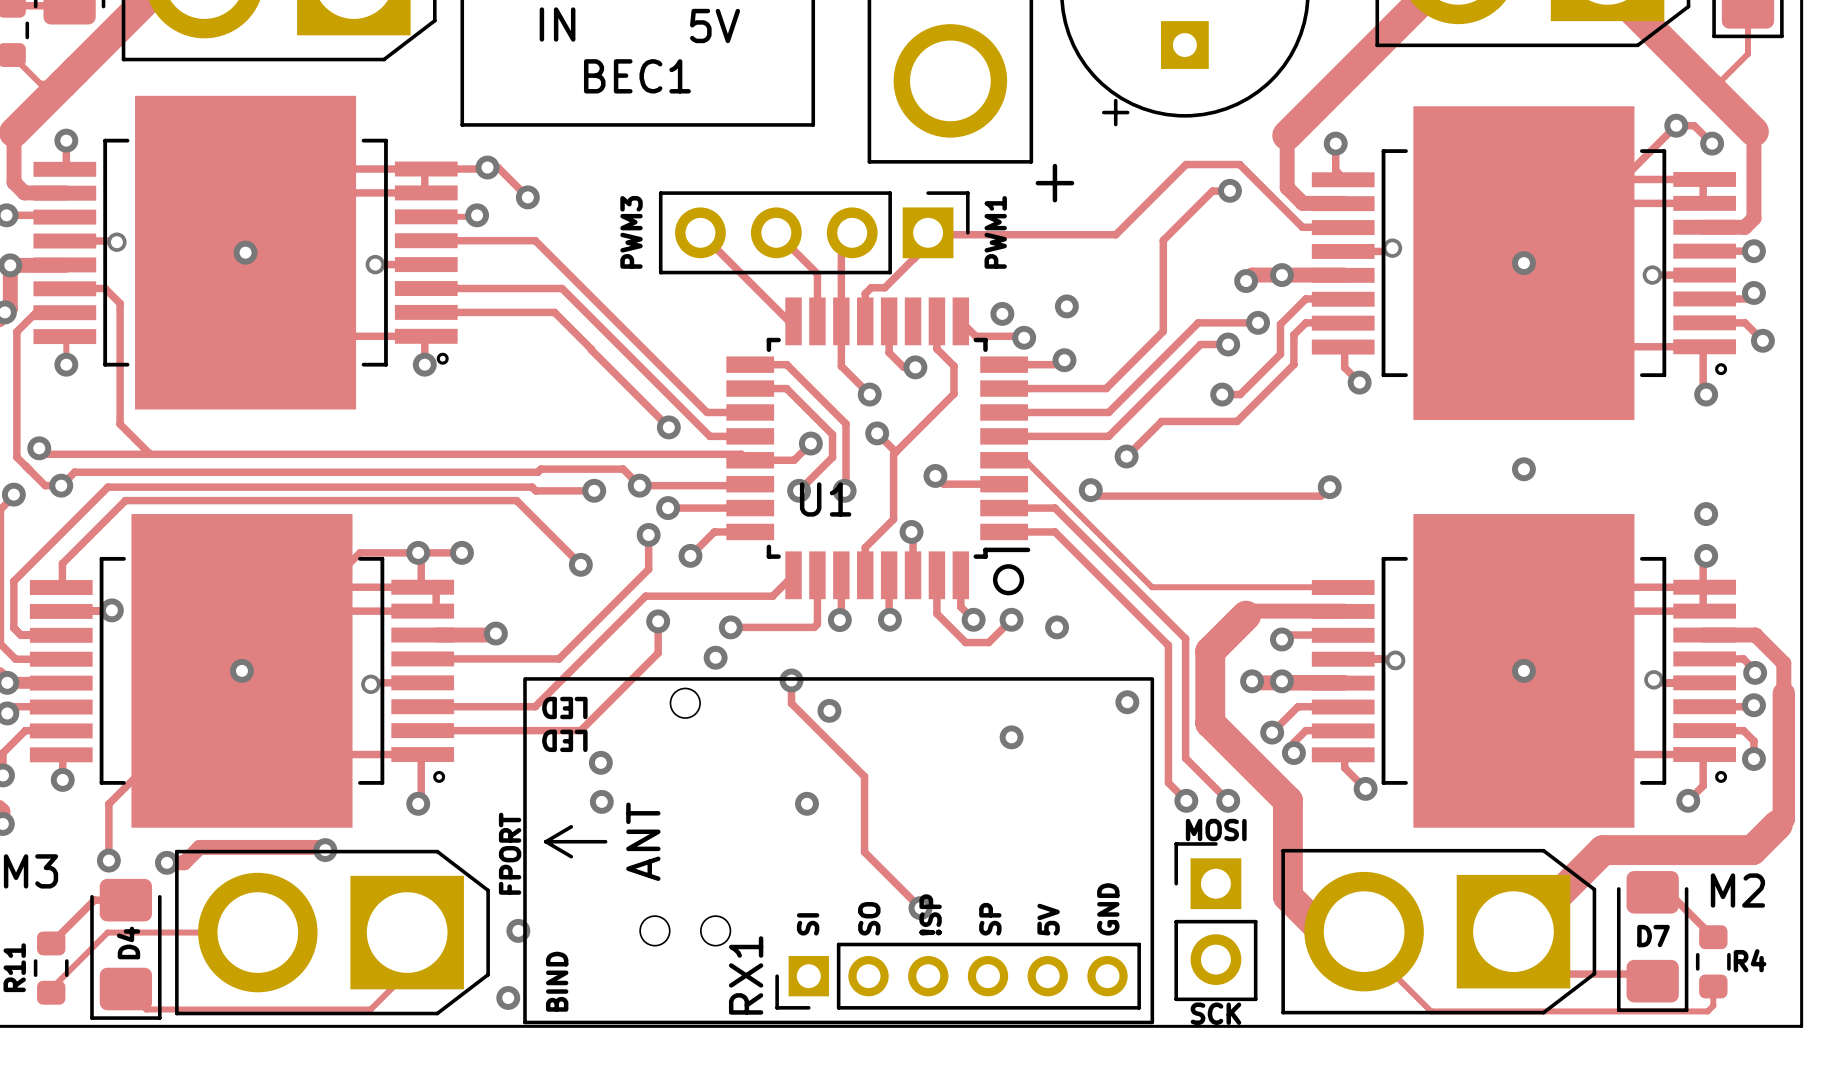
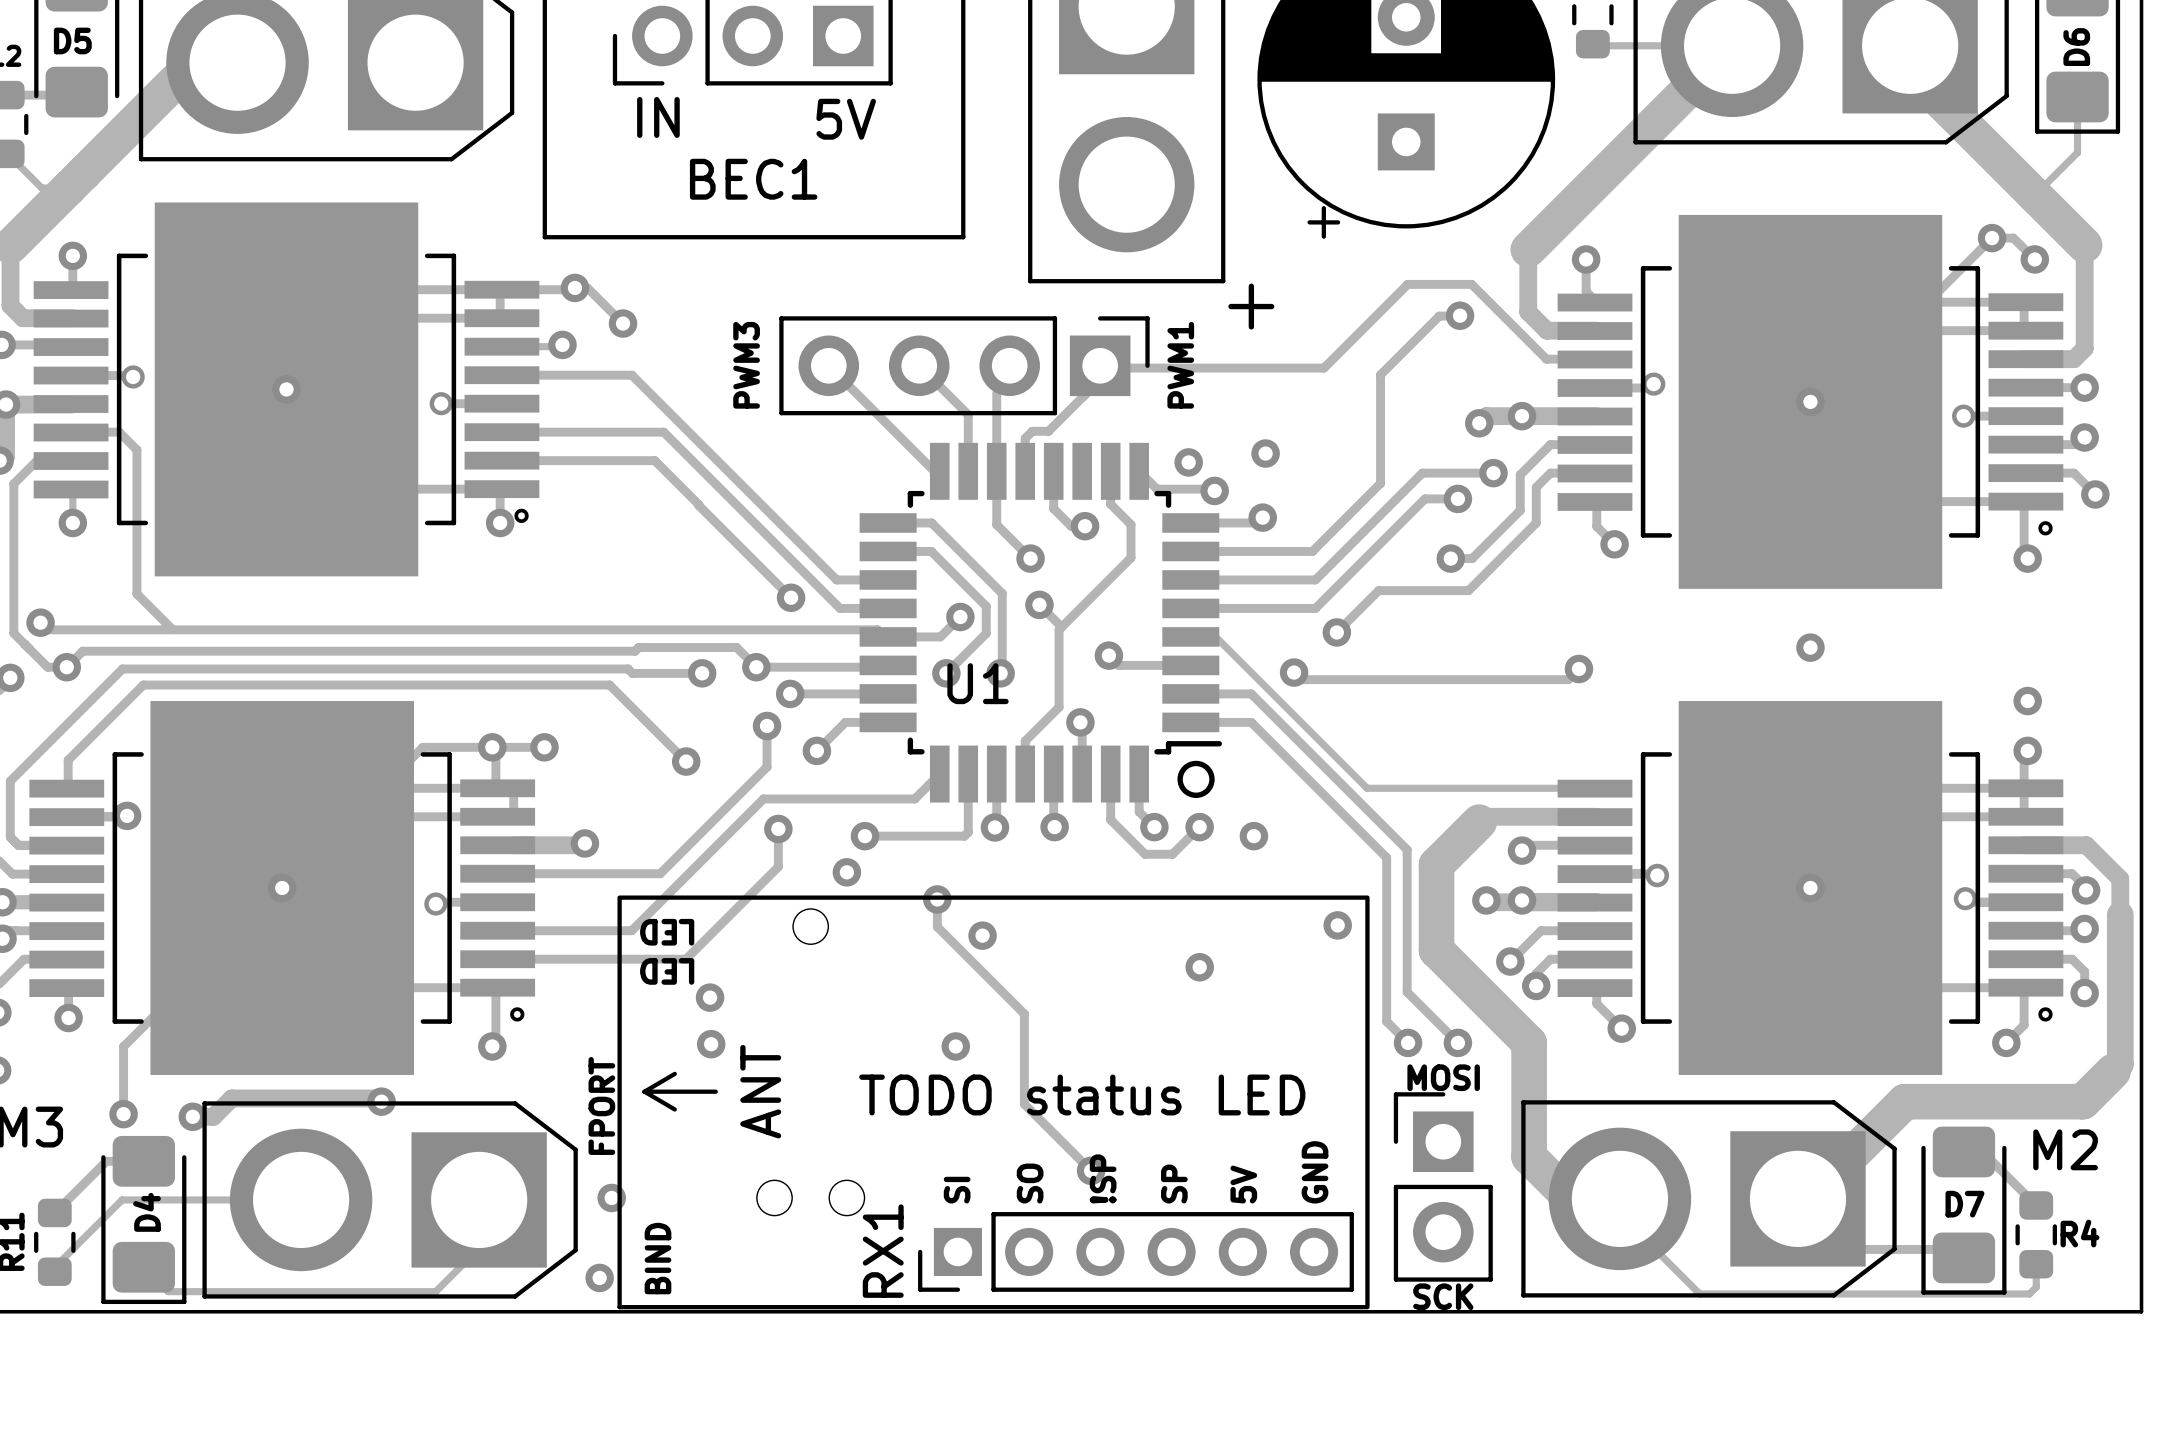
text: none -> TODO status LED (1082, 1094)

